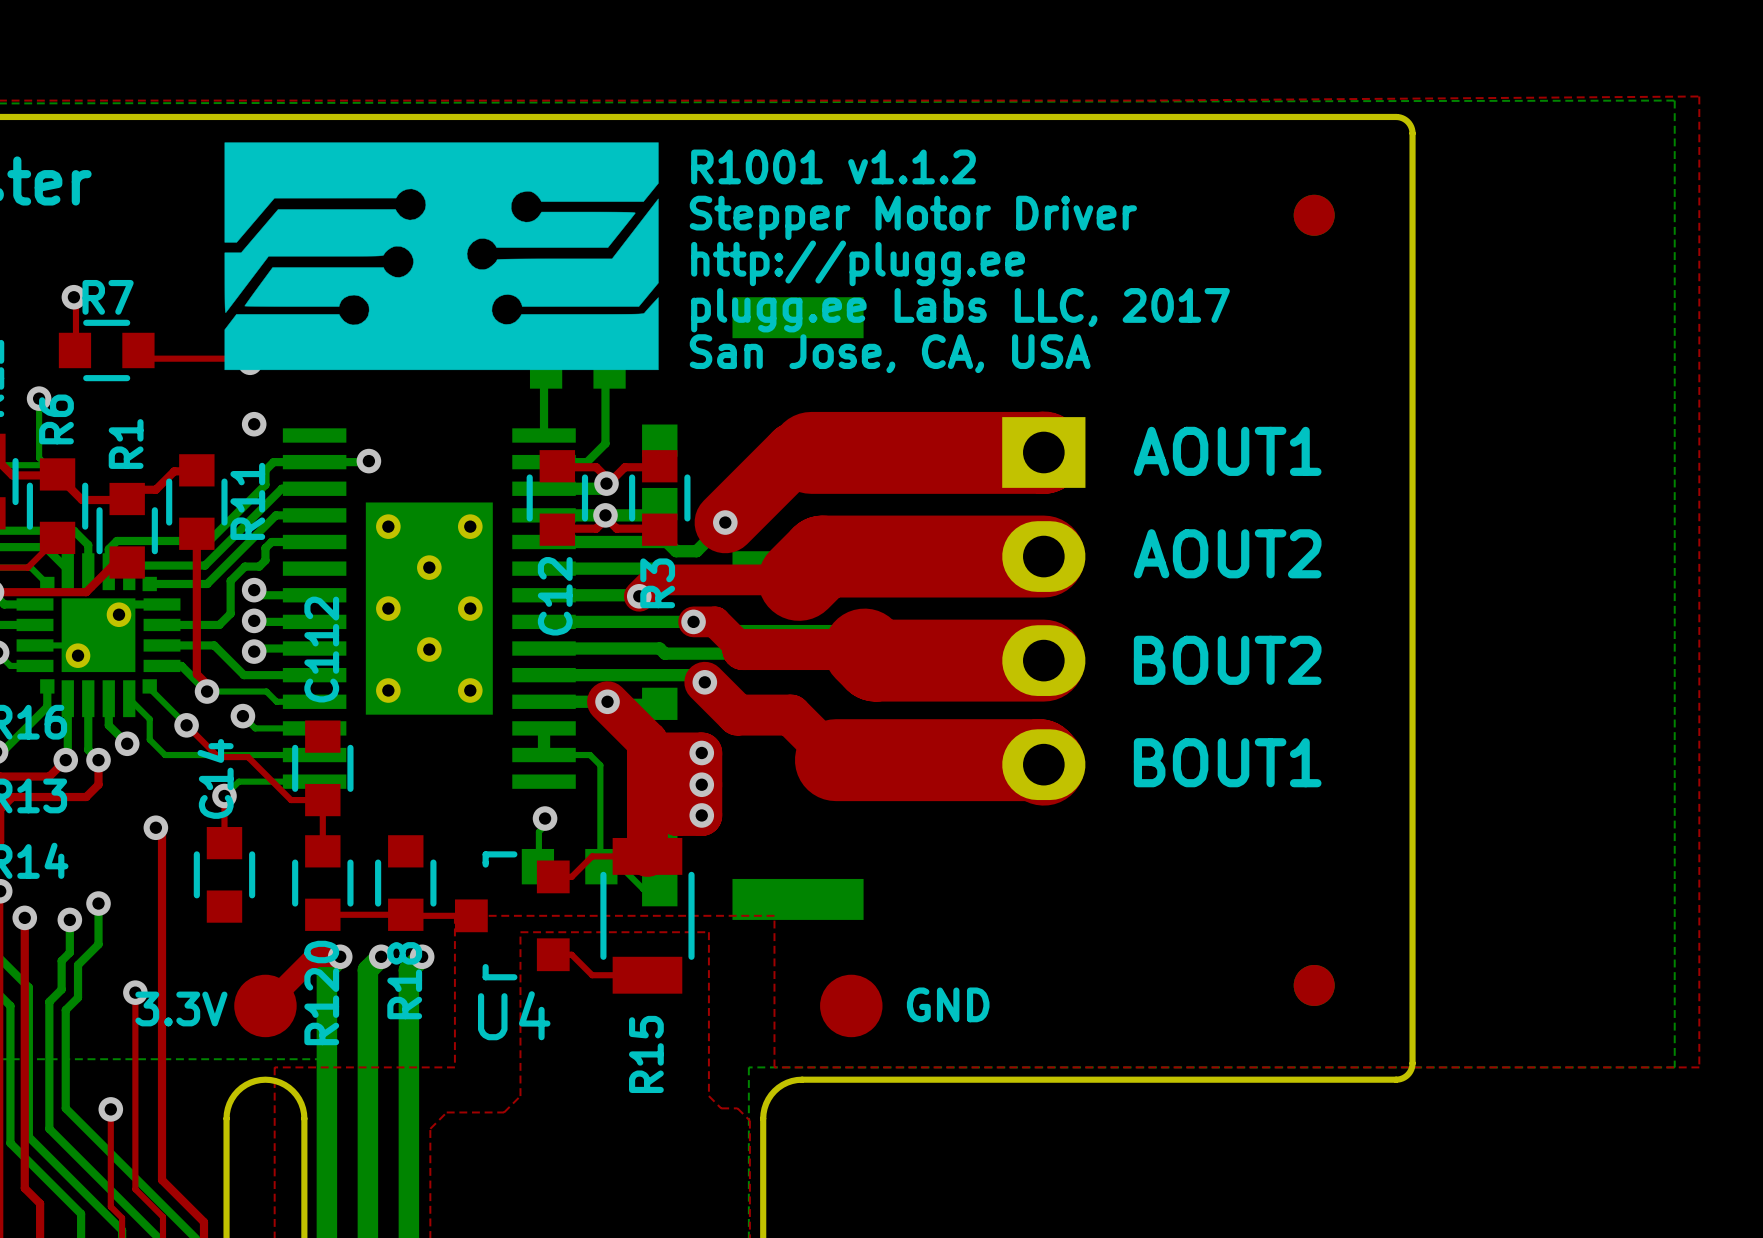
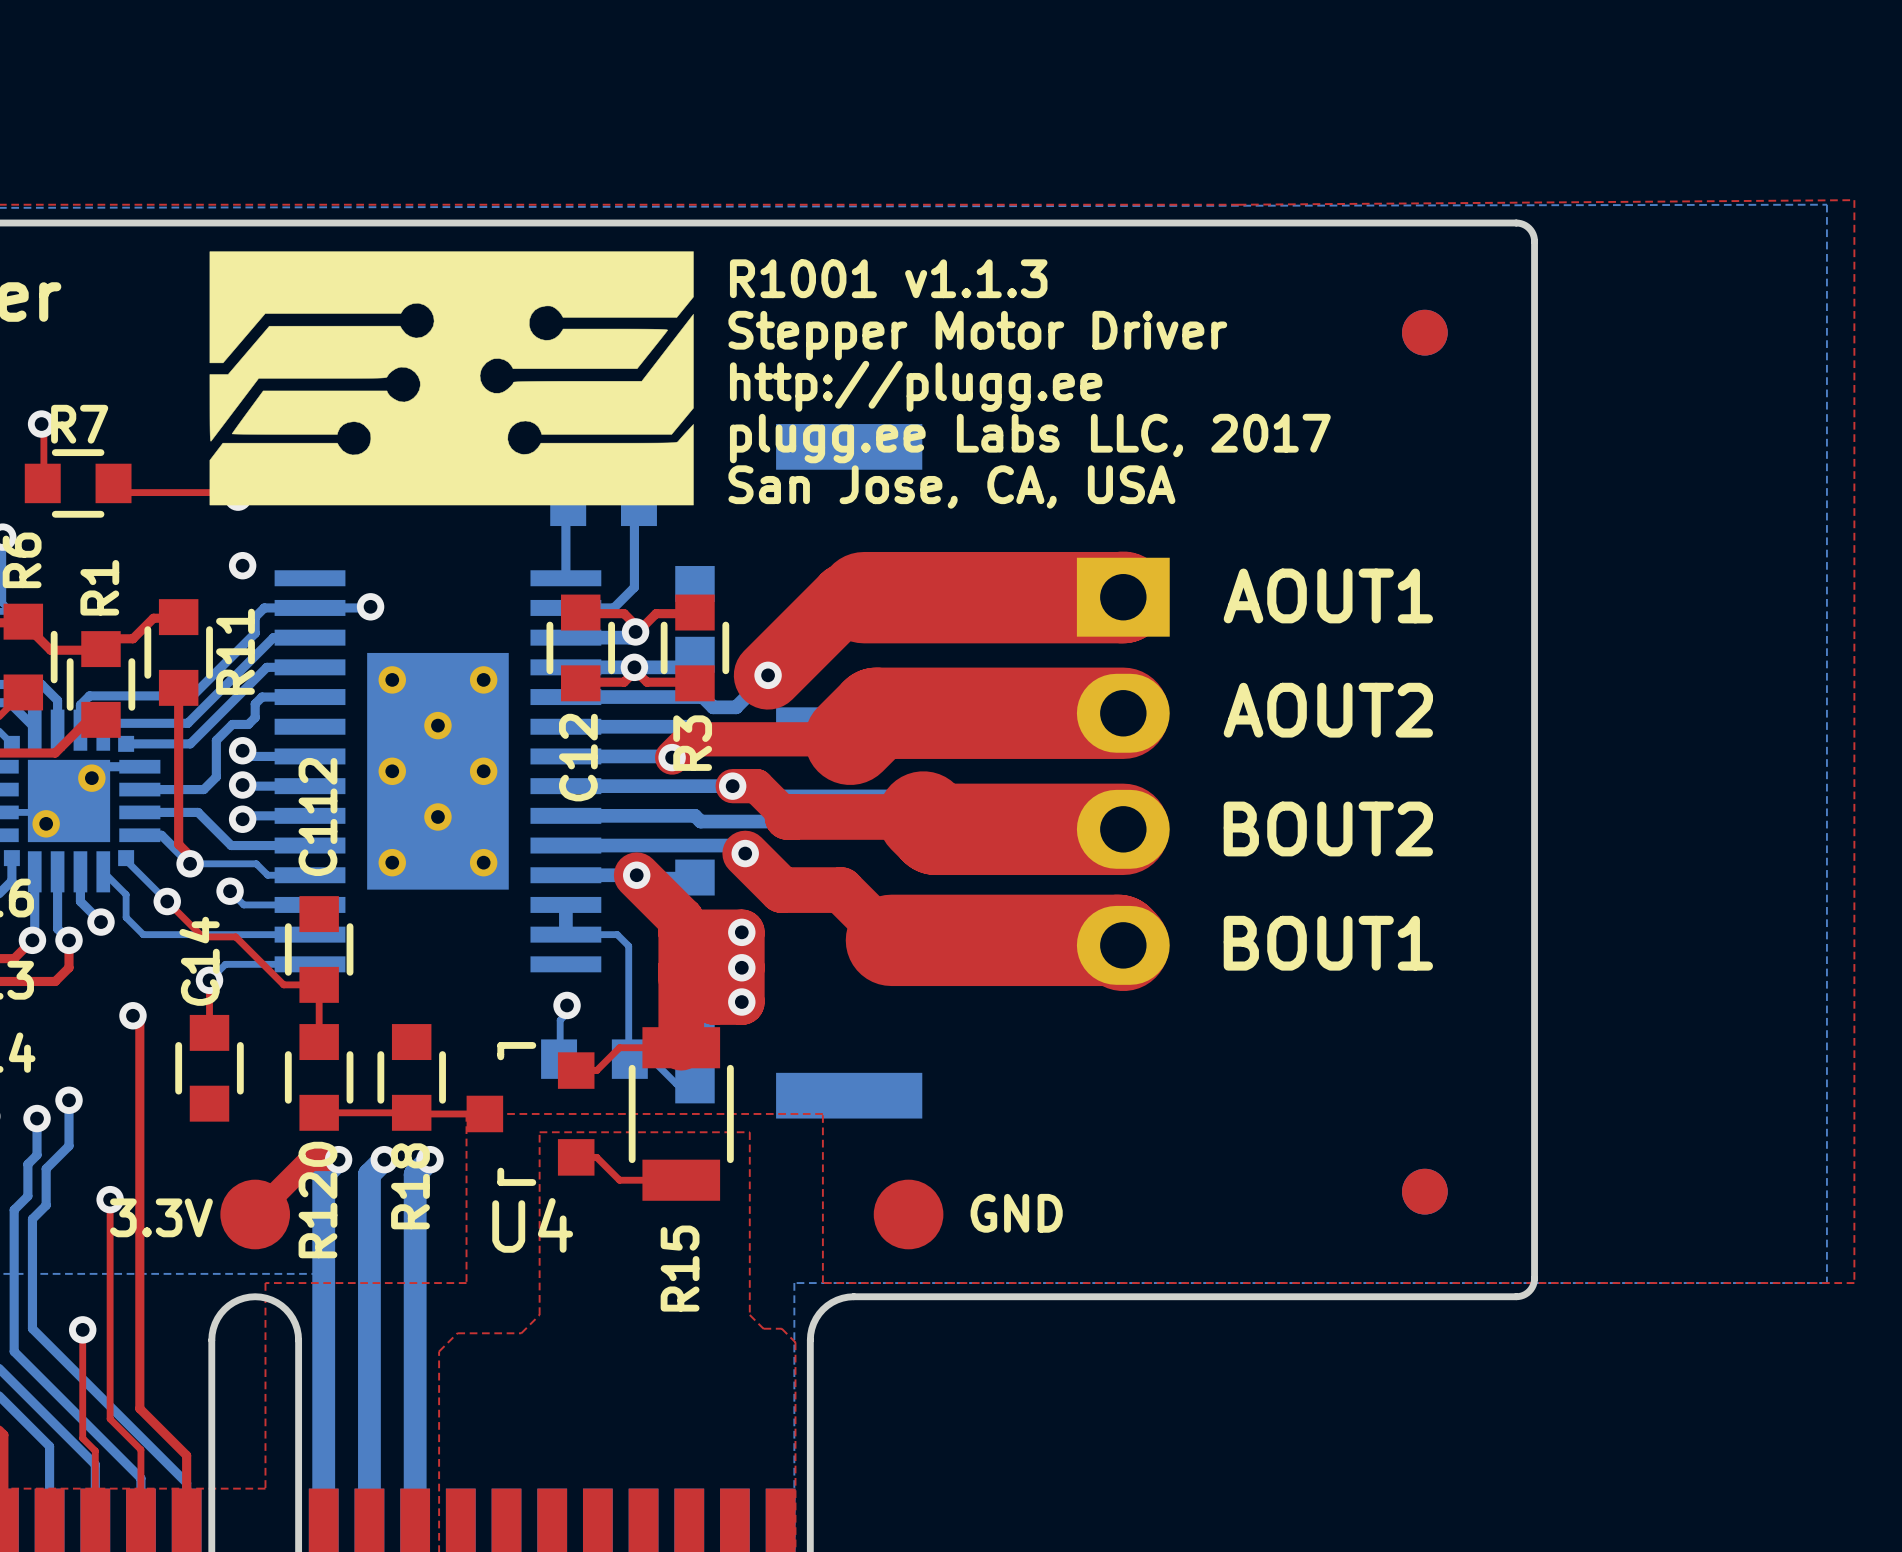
text: R1001 v1.1.2 (833, 166) -> R1001 v1.1.3 (888, 278)

